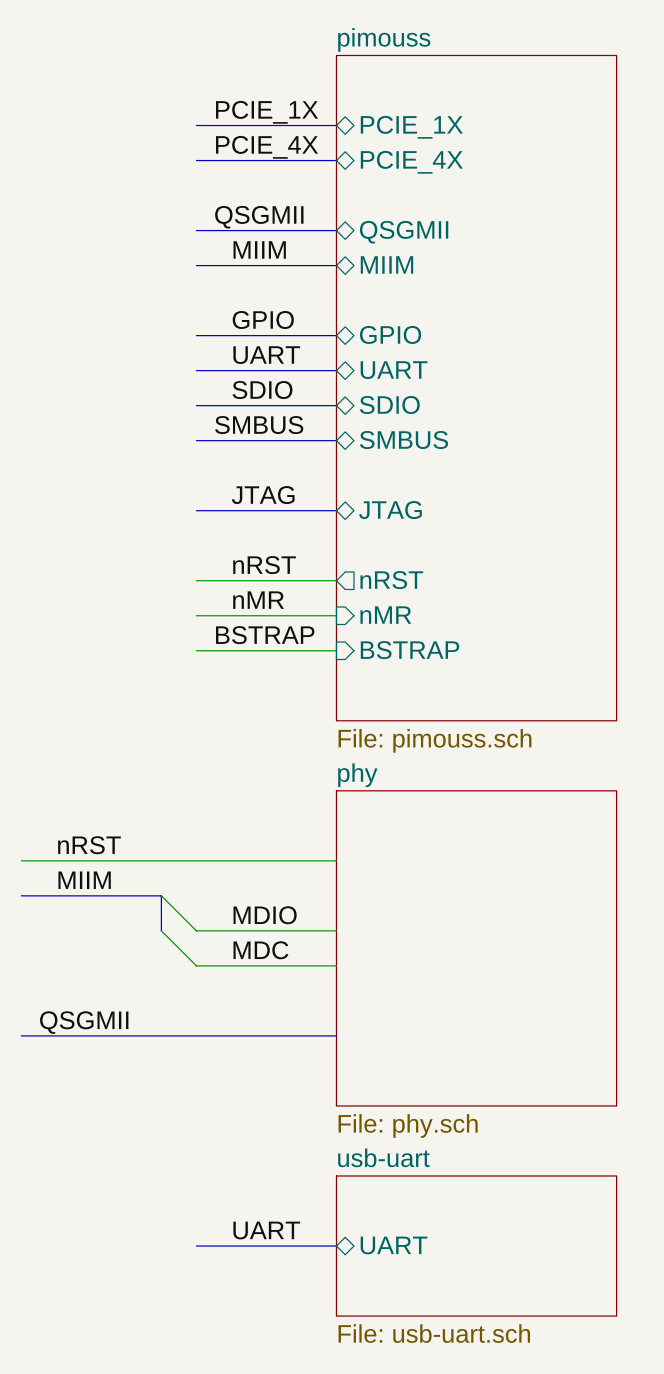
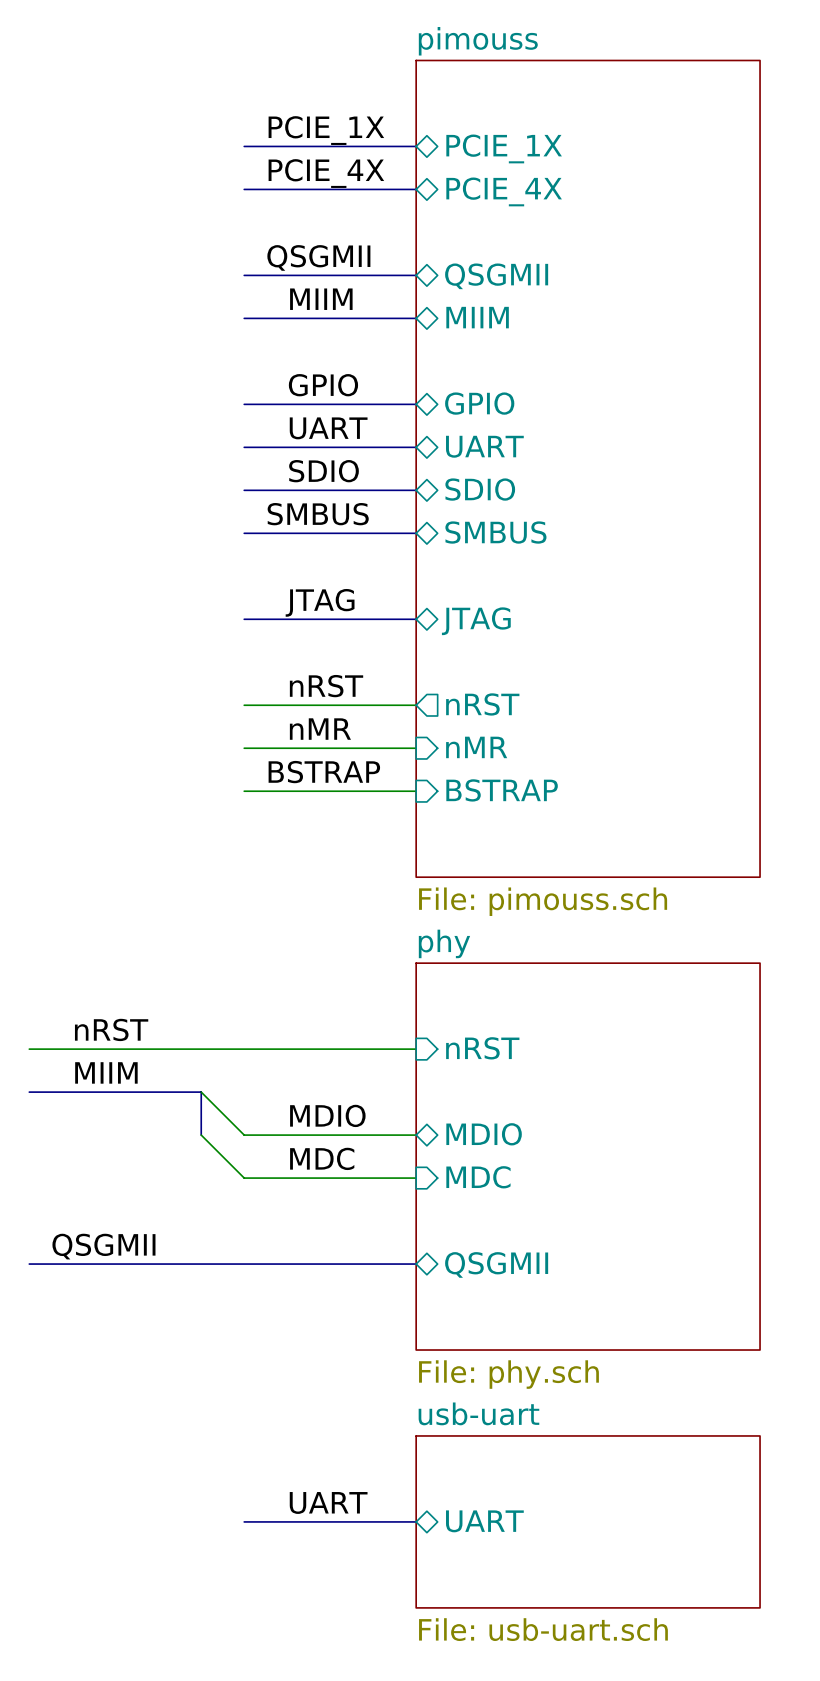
sheet pin: none -> nRST (482, 1048)
sheet pin: none -> MDIO (484, 1134)
sheet pin: none -> MDC (478, 1177)
sheet pin: none -> QSGMII (496, 1264)

